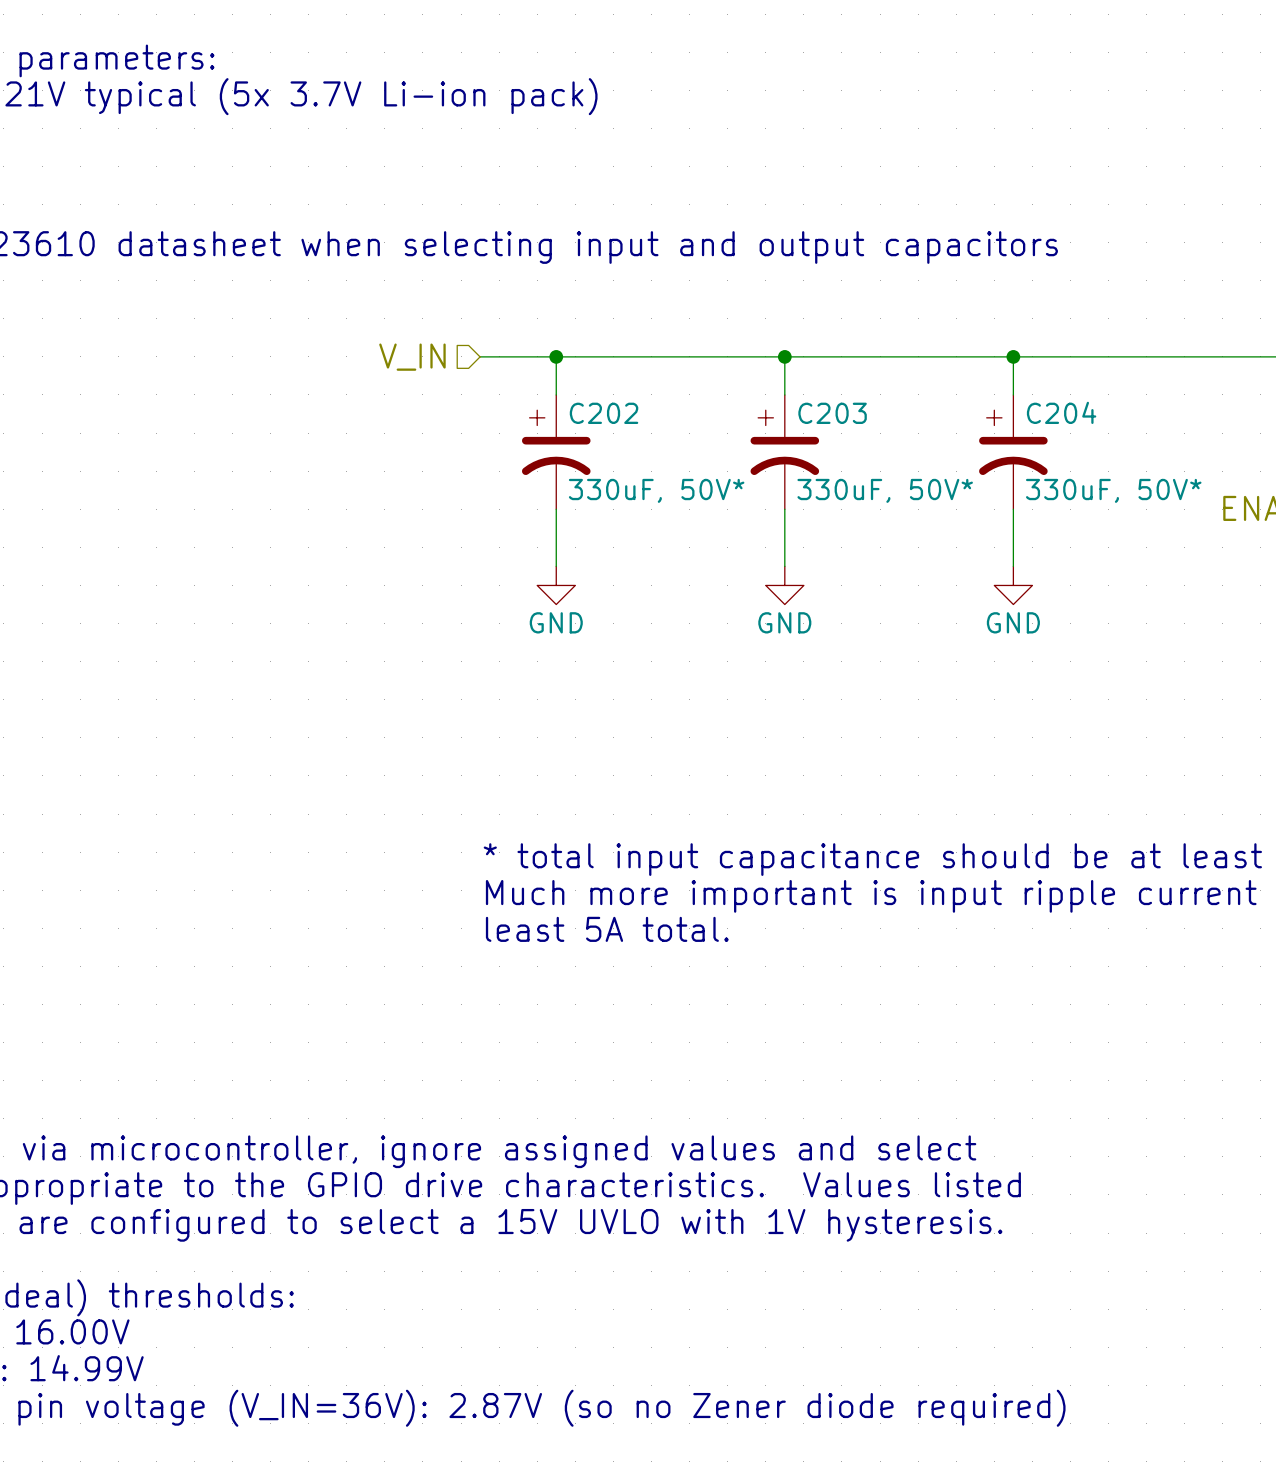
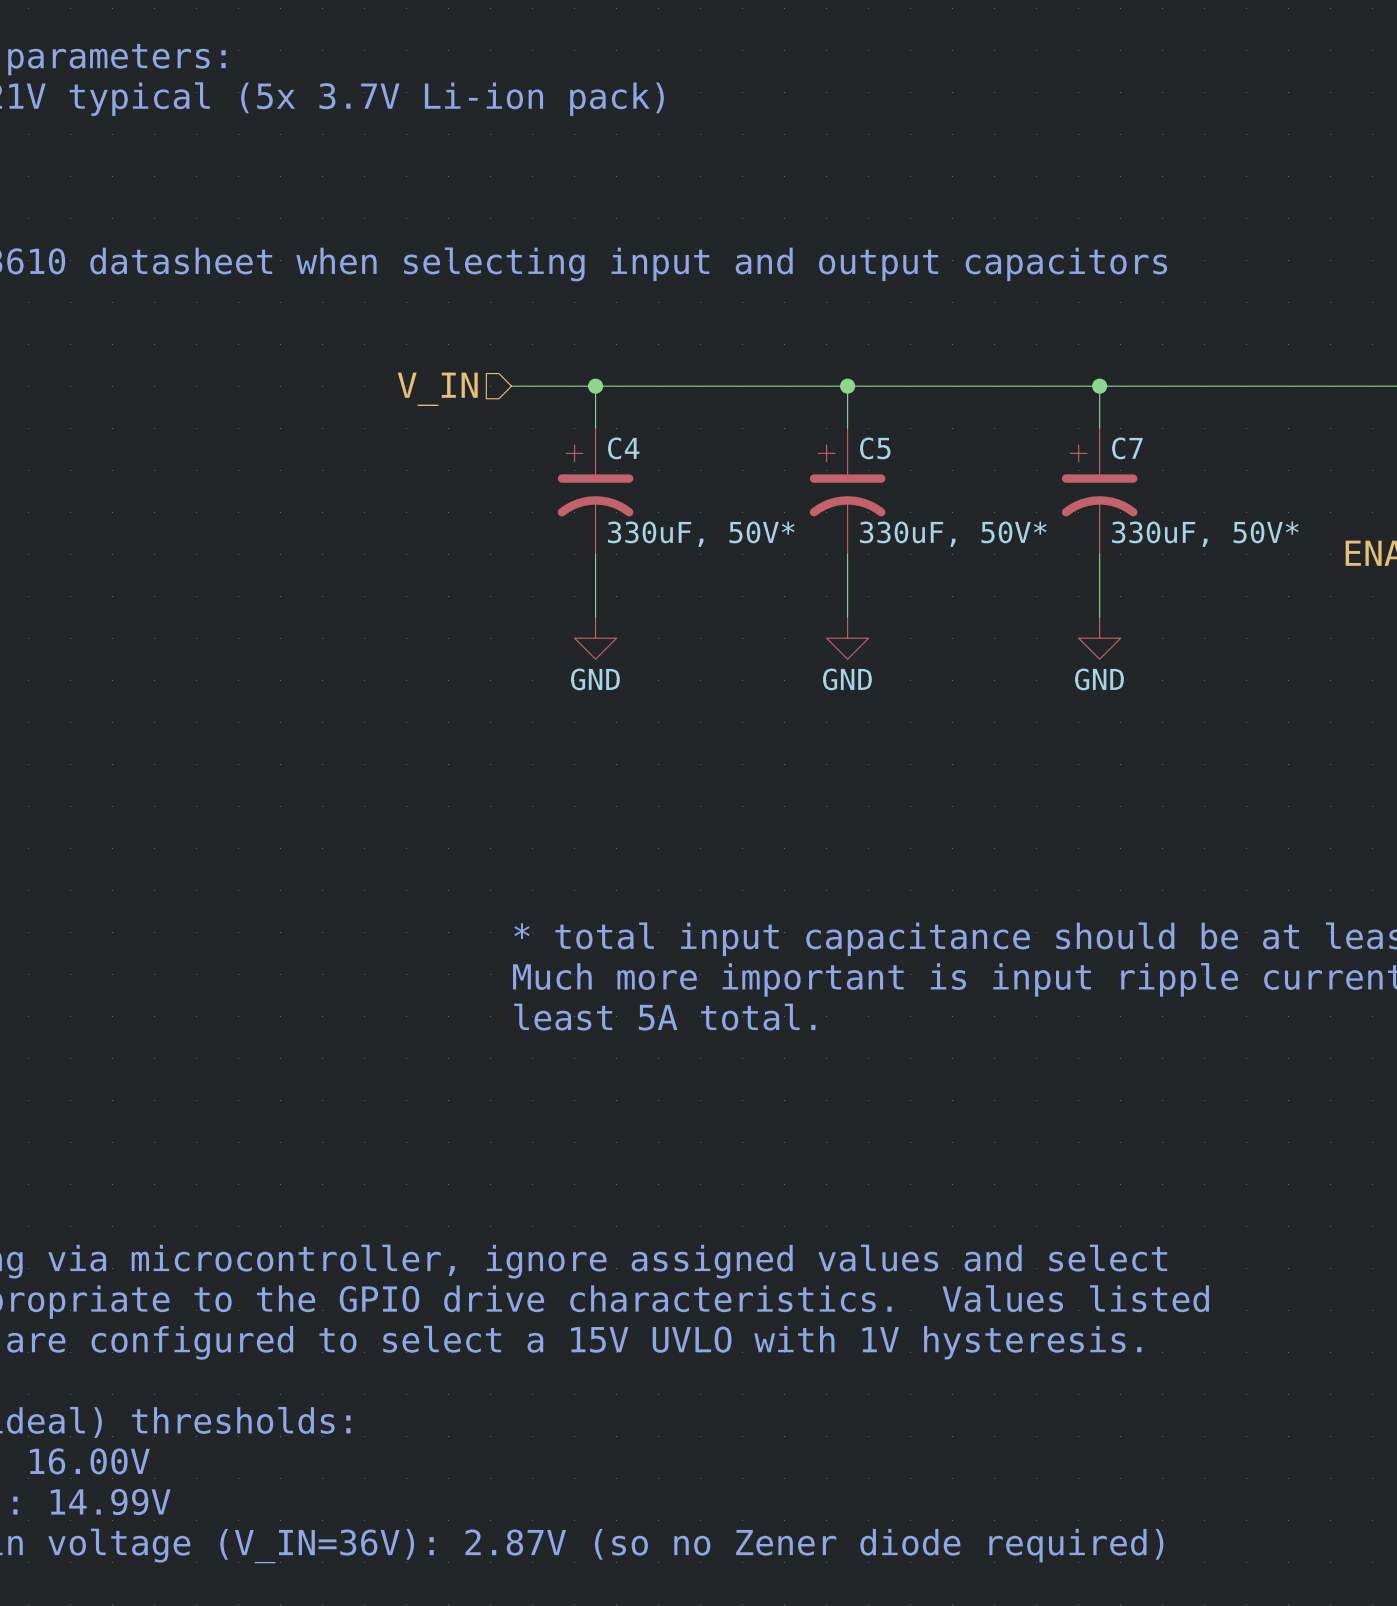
C204 name: C204 (1061, 412) -> C7 (1127, 448)
C202 name: C202 (604, 413) -> C4 (623, 448)
C203 name: C203 (832, 413) -> C5 (875, 448)

